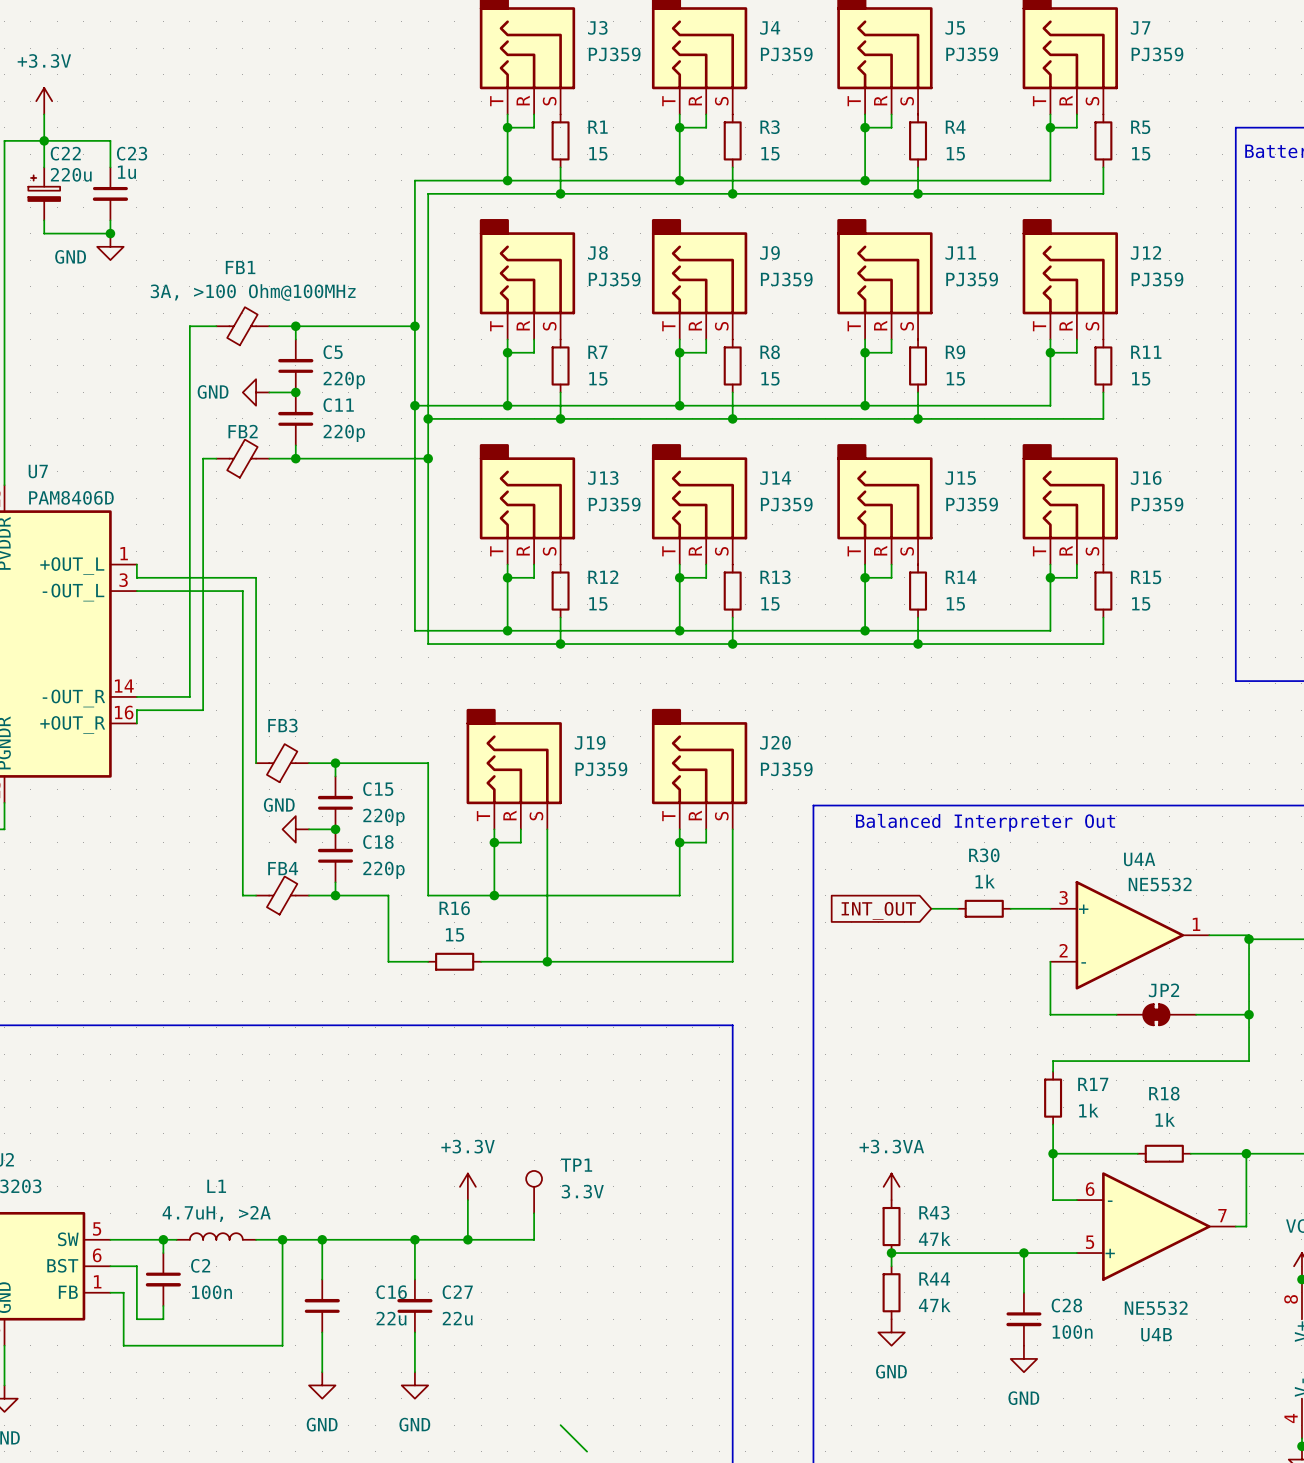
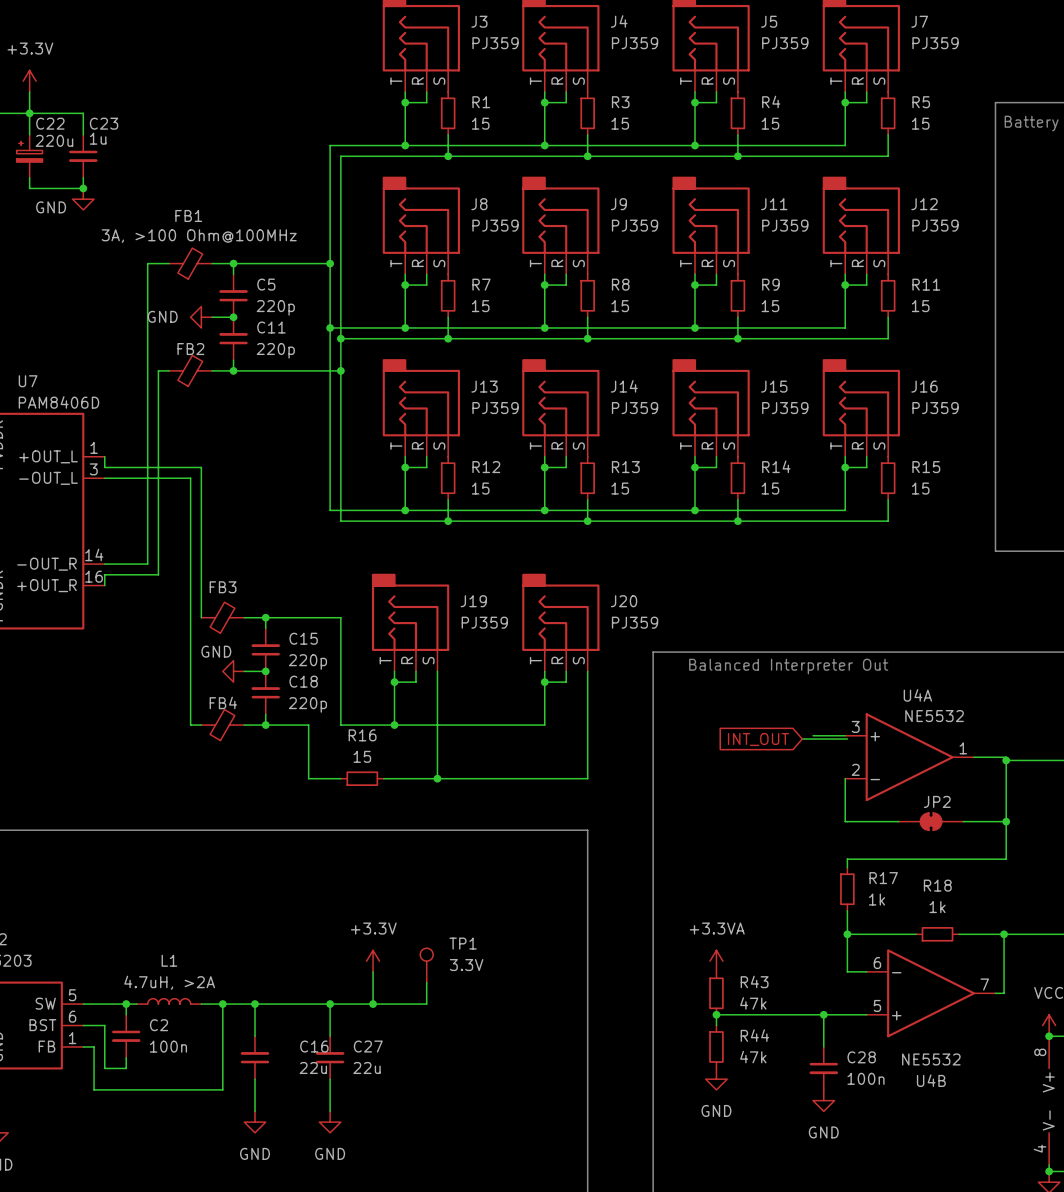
wire: (931, 908) (957, 908) -> none
R30: 1k (984, 908) -> none
global label position: INT_OUT (878, 910) -> INT_OUT (758, 739)
wire: none -> (802, 738) (847, 738)
wire: (560, 1425) (587, 1451) -> none

